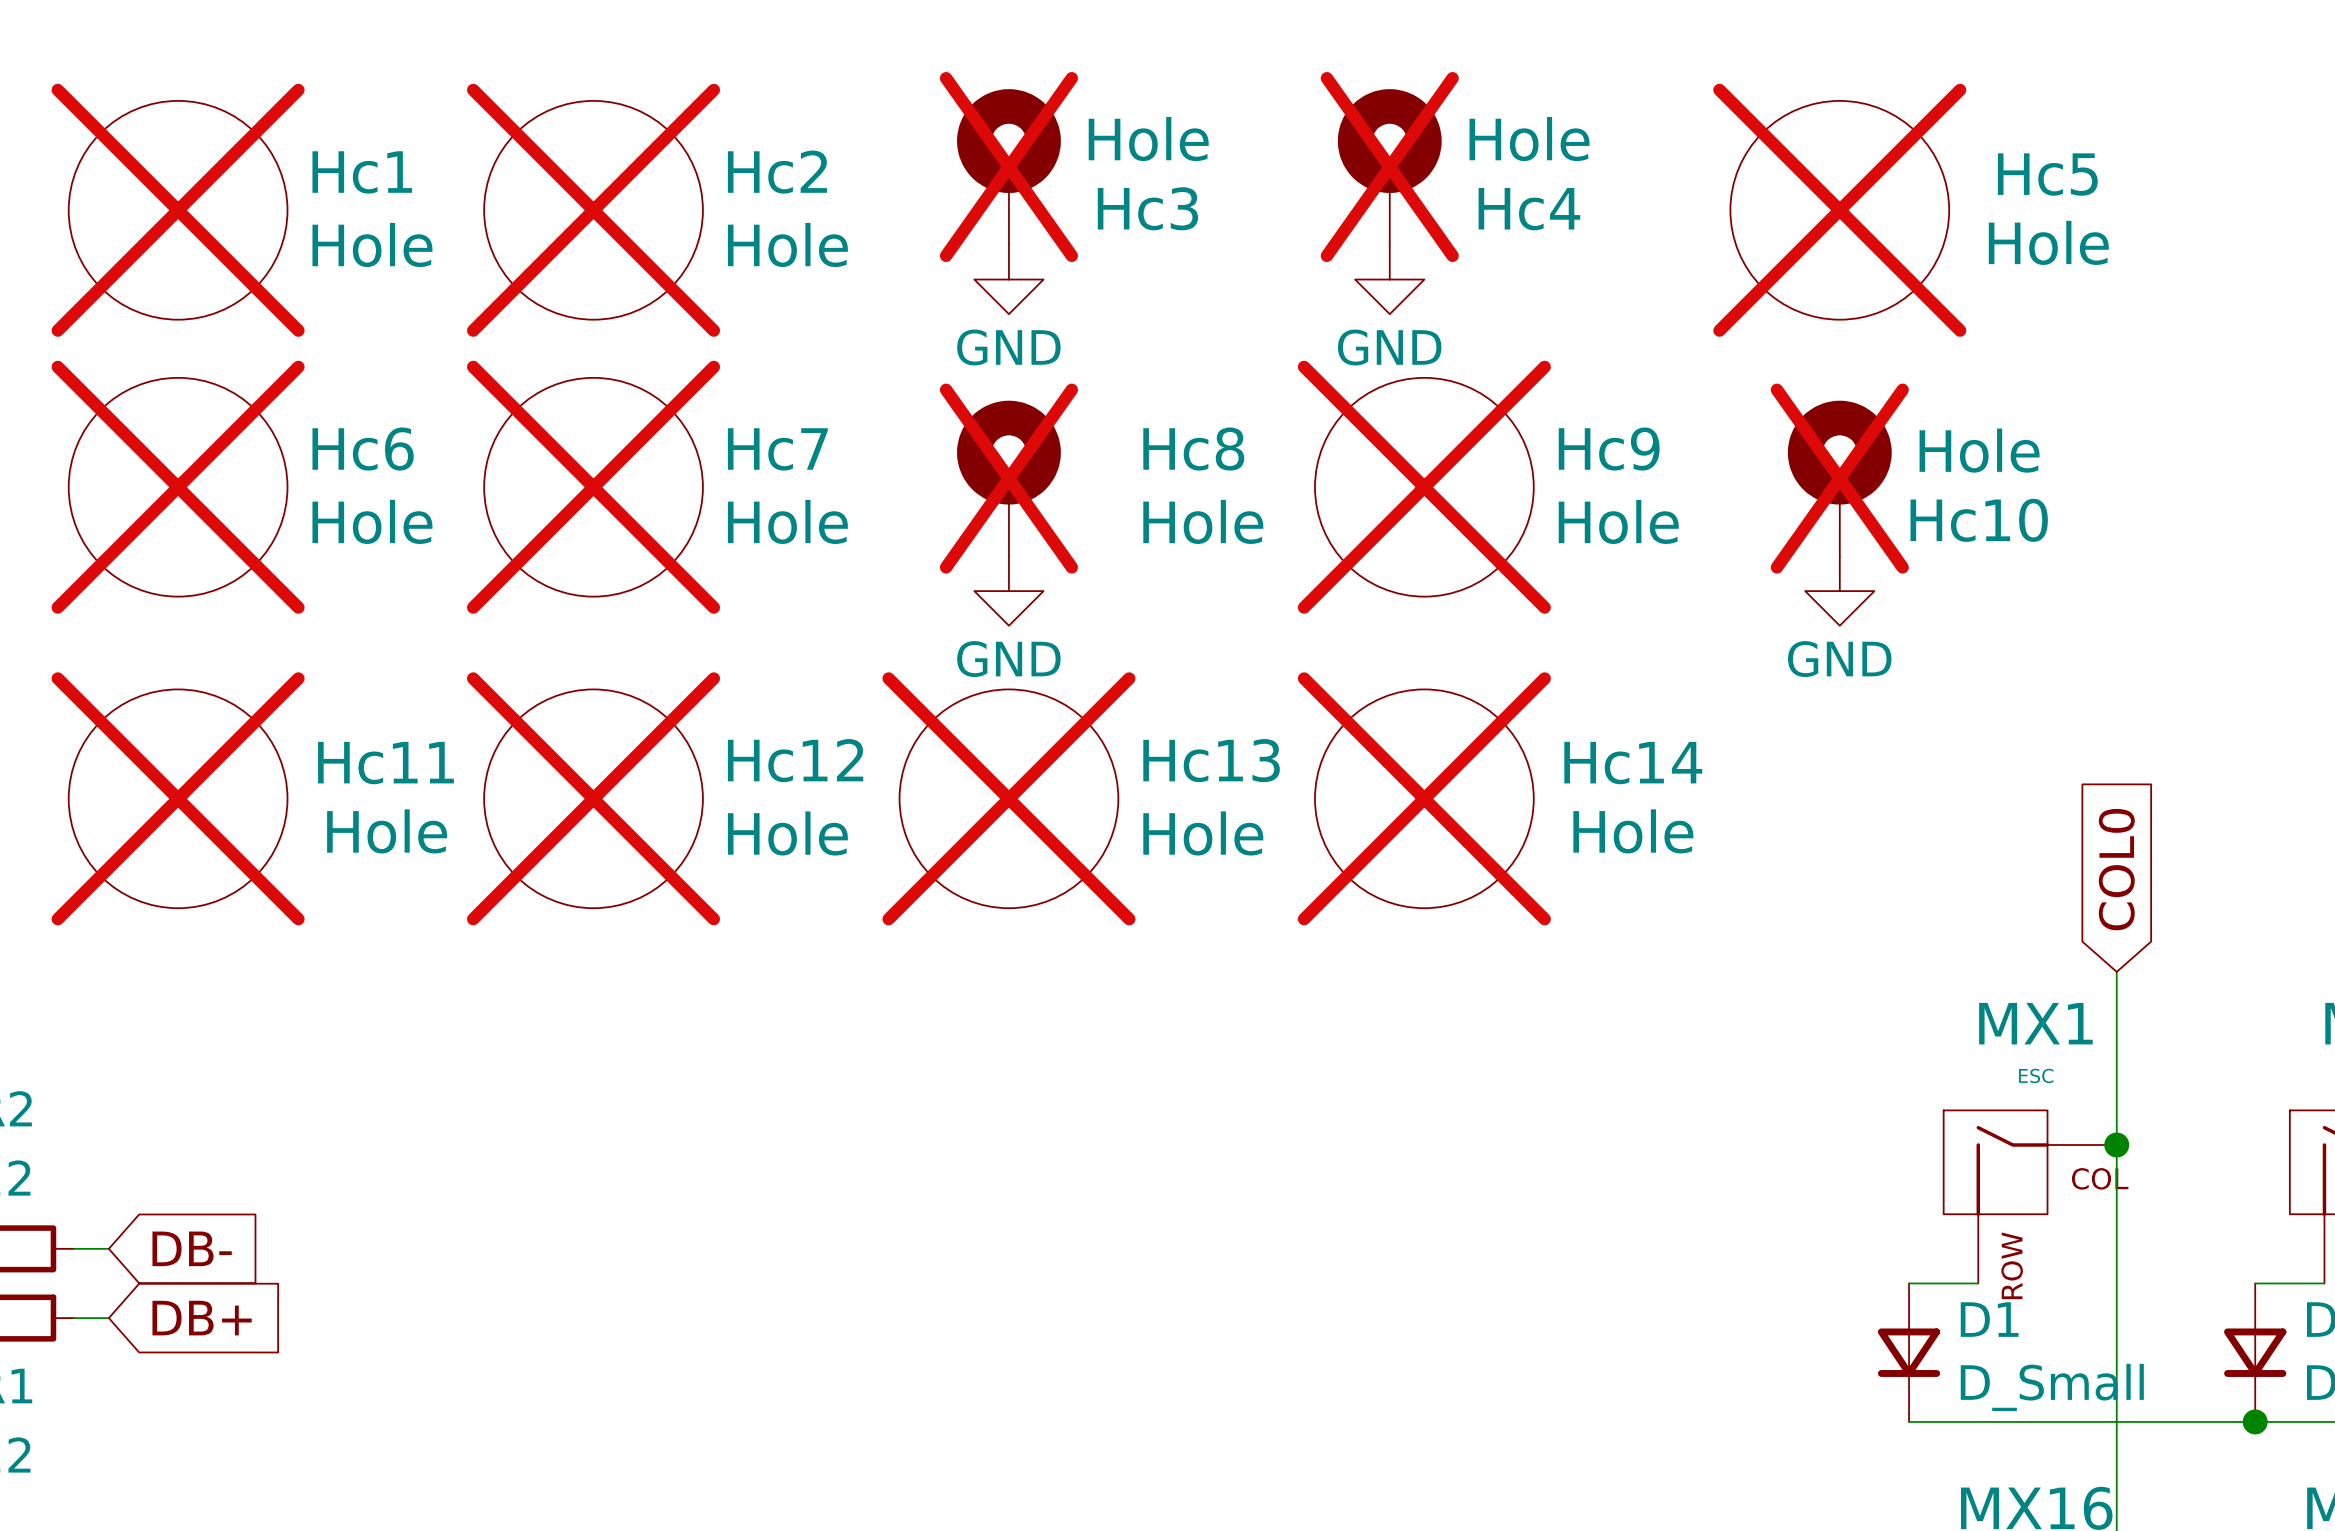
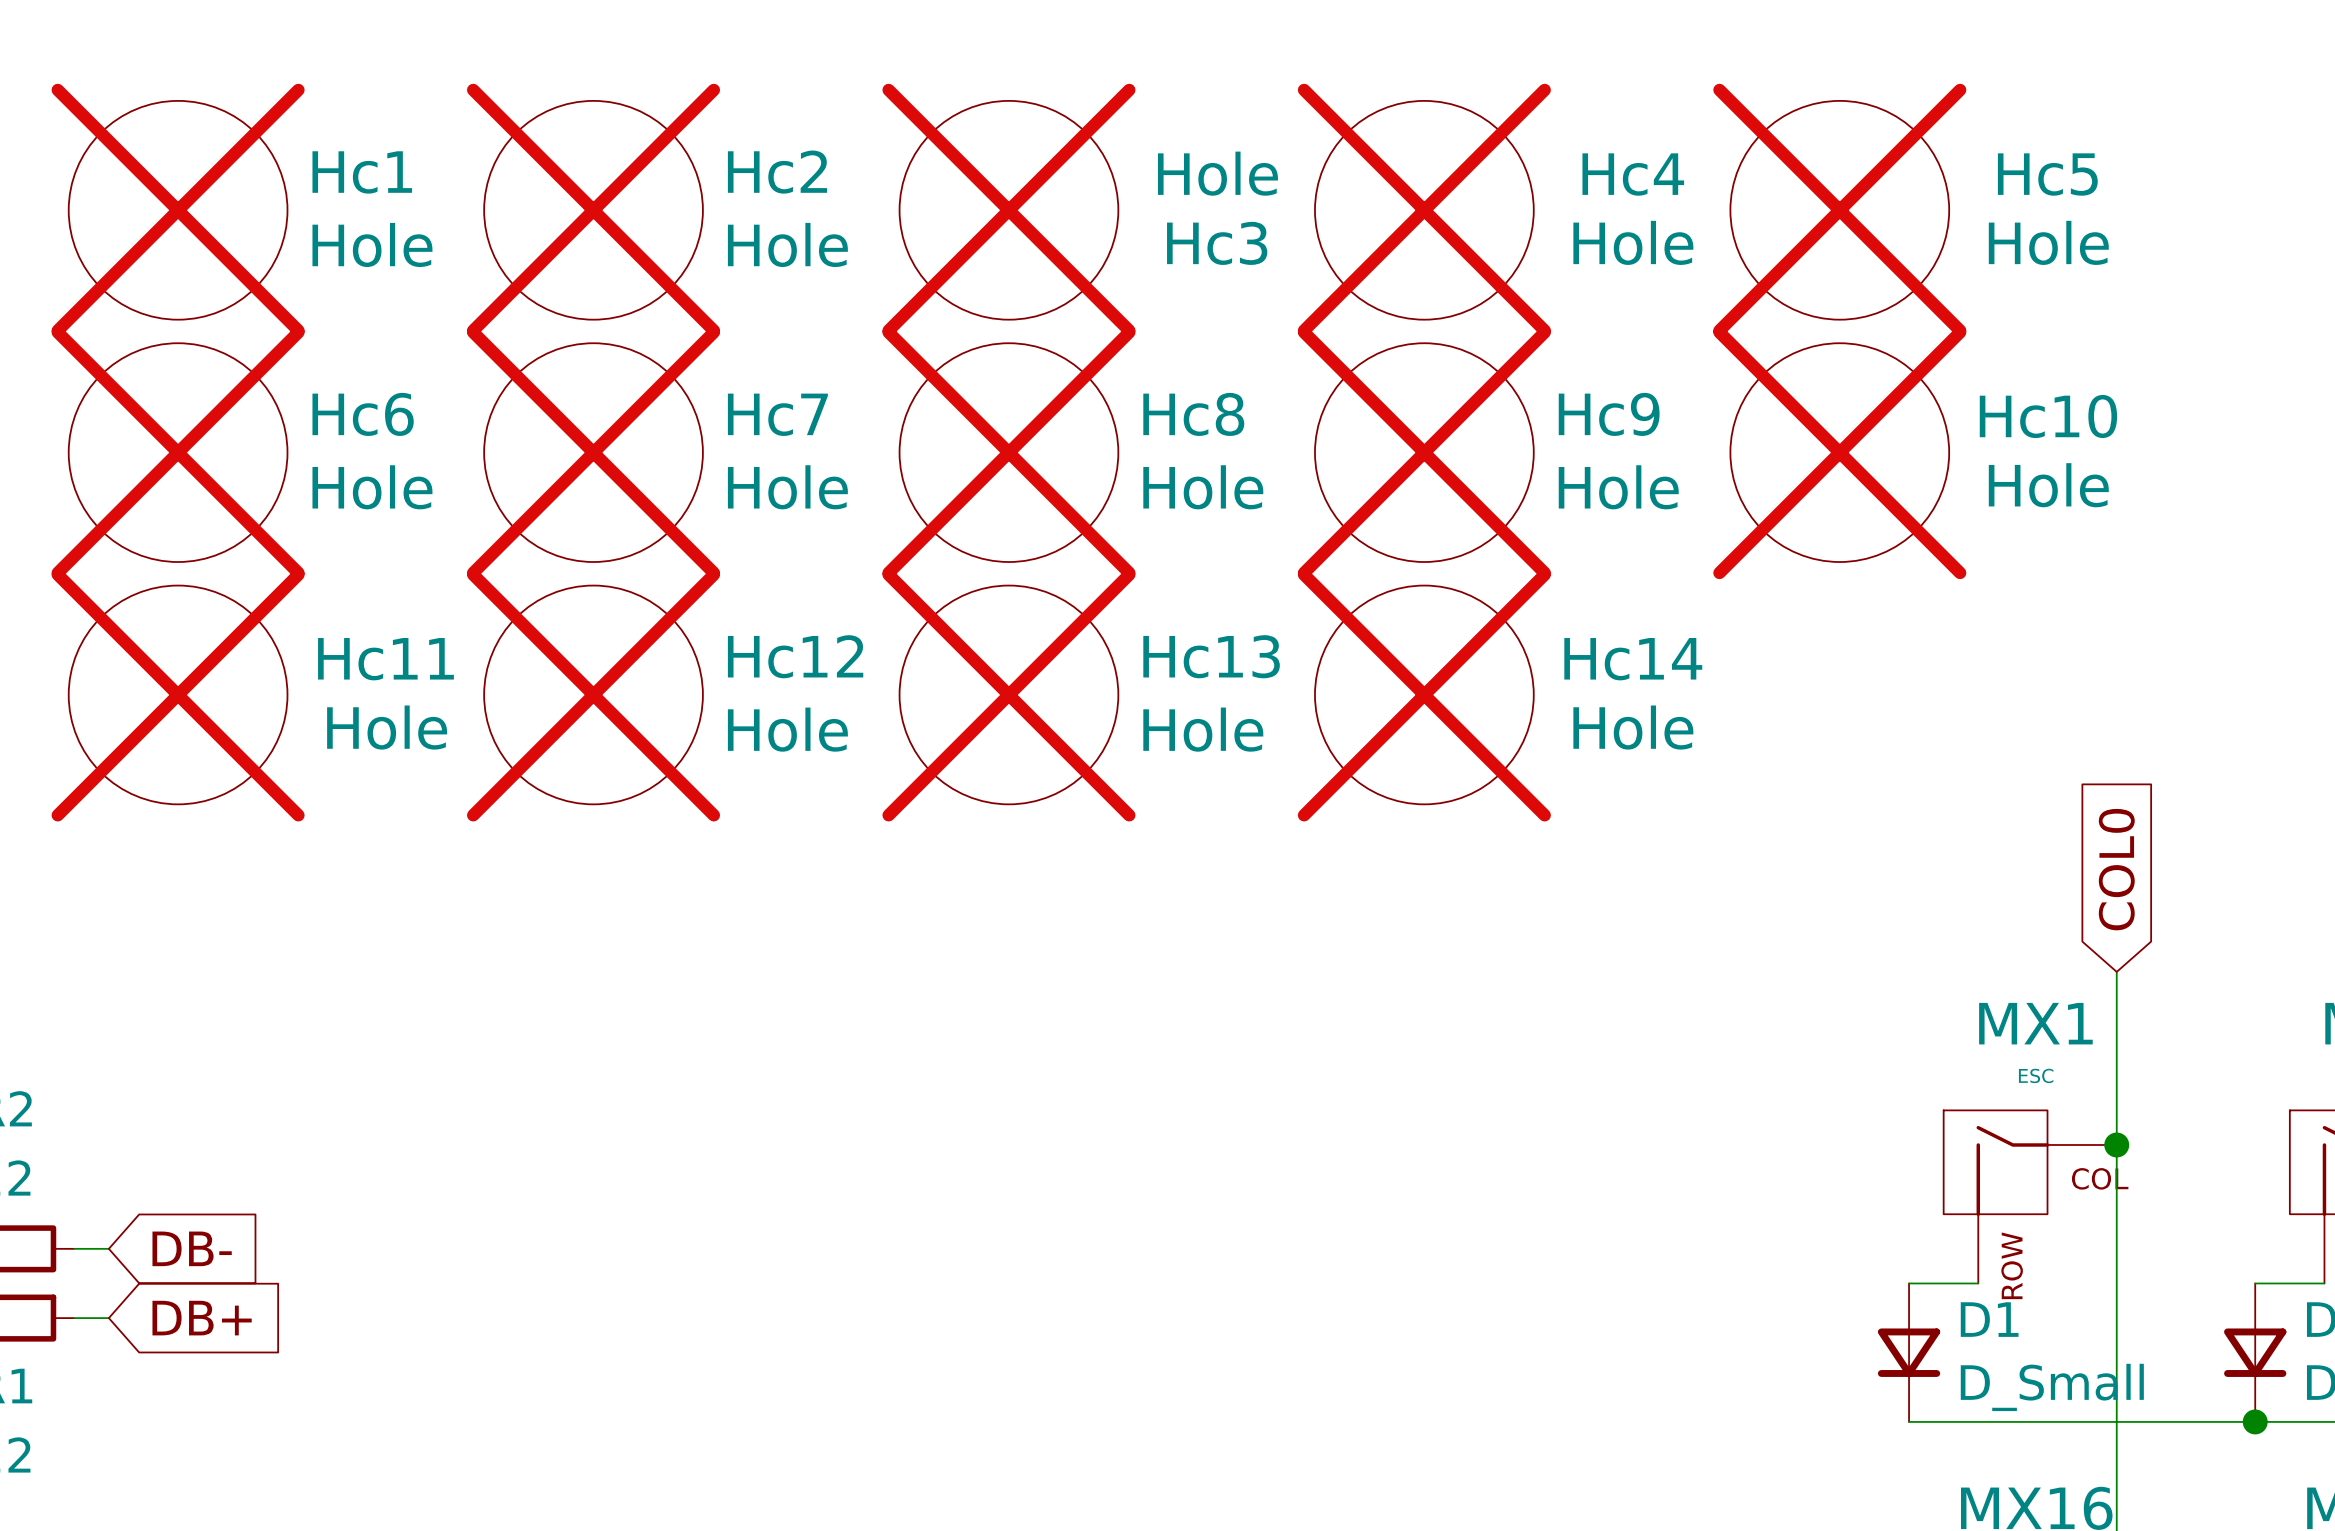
Hc3 symbol: [957, 89, 1061, 245] -> [899, 100, 1119, 320]
Hc4 symbol: [1337, 89, 1442, 245] -> [1314, 100, 1534, 320]
Hc3 value position: Hole (1148, 139) -> Hole (1217, 173)
Hc4 value position: Hole (1529, 139) -> Hole (1633, 242)
Hc3 name position: Hc3 (1147, 208) -> Hc3 (1217, 243)
Hc4 name position: Hc4 (1529, 209) -> Hc4 (1633, 174)
power symbol: GND (1008, 279) -> none
power symbol: GND (1389, 279) -> none
Hc8 symbol: [957, 400, 1061, 557] -> [899, 343, 1119, 563]
Hc10 symbol: [1787, 400, 1892, 557] -> [1730, 343, 1950, 563]
Hc10 value position: Hole (1979, 450) -> Hole (2048, 485)
Hc6 position: (178, 487) -> (178, 452)
Hc7 position: (593, 487) -> (593, 452)
Hc9 position: (1424, 487) -> (1424, 452)
Hc10 name position: Hc10 (1979, 520) -> Hc10 (2048, 416)
power symbol: GND (1008, 591) -> none
power symbol: GND (1839, 591) -> none
Hc11 position: (178, 798) -> (178, 694)
Hc12 position: (593, 798) -> (593, 694)
Hc13 position: (1008, 798) -> (1008, 694)
Hc14 position: (1424, 798) -> (1424, 694)

